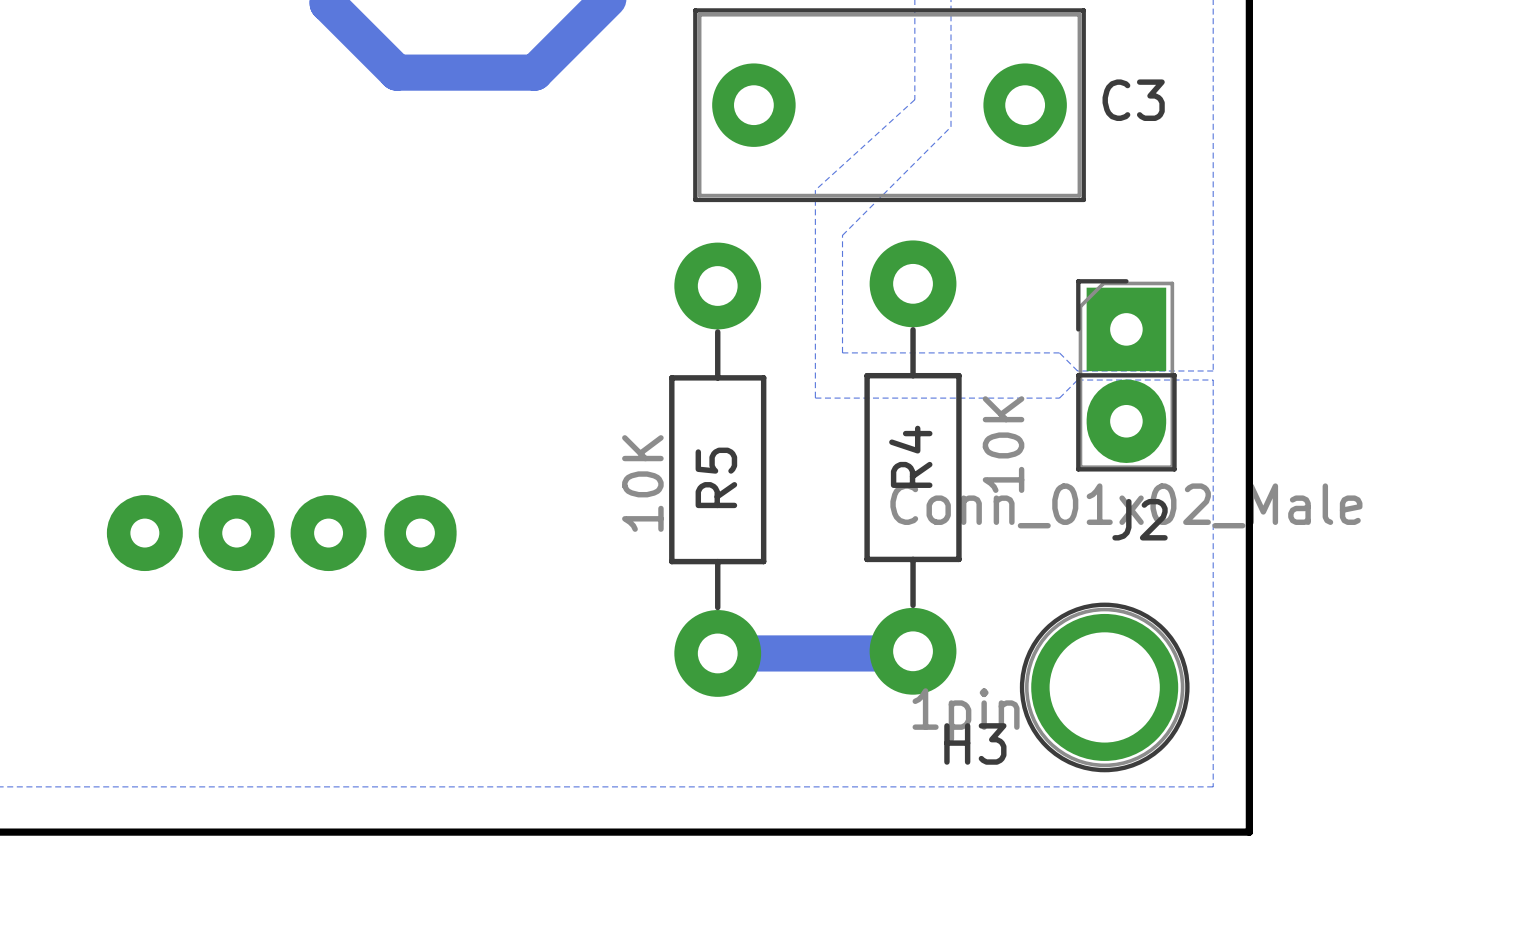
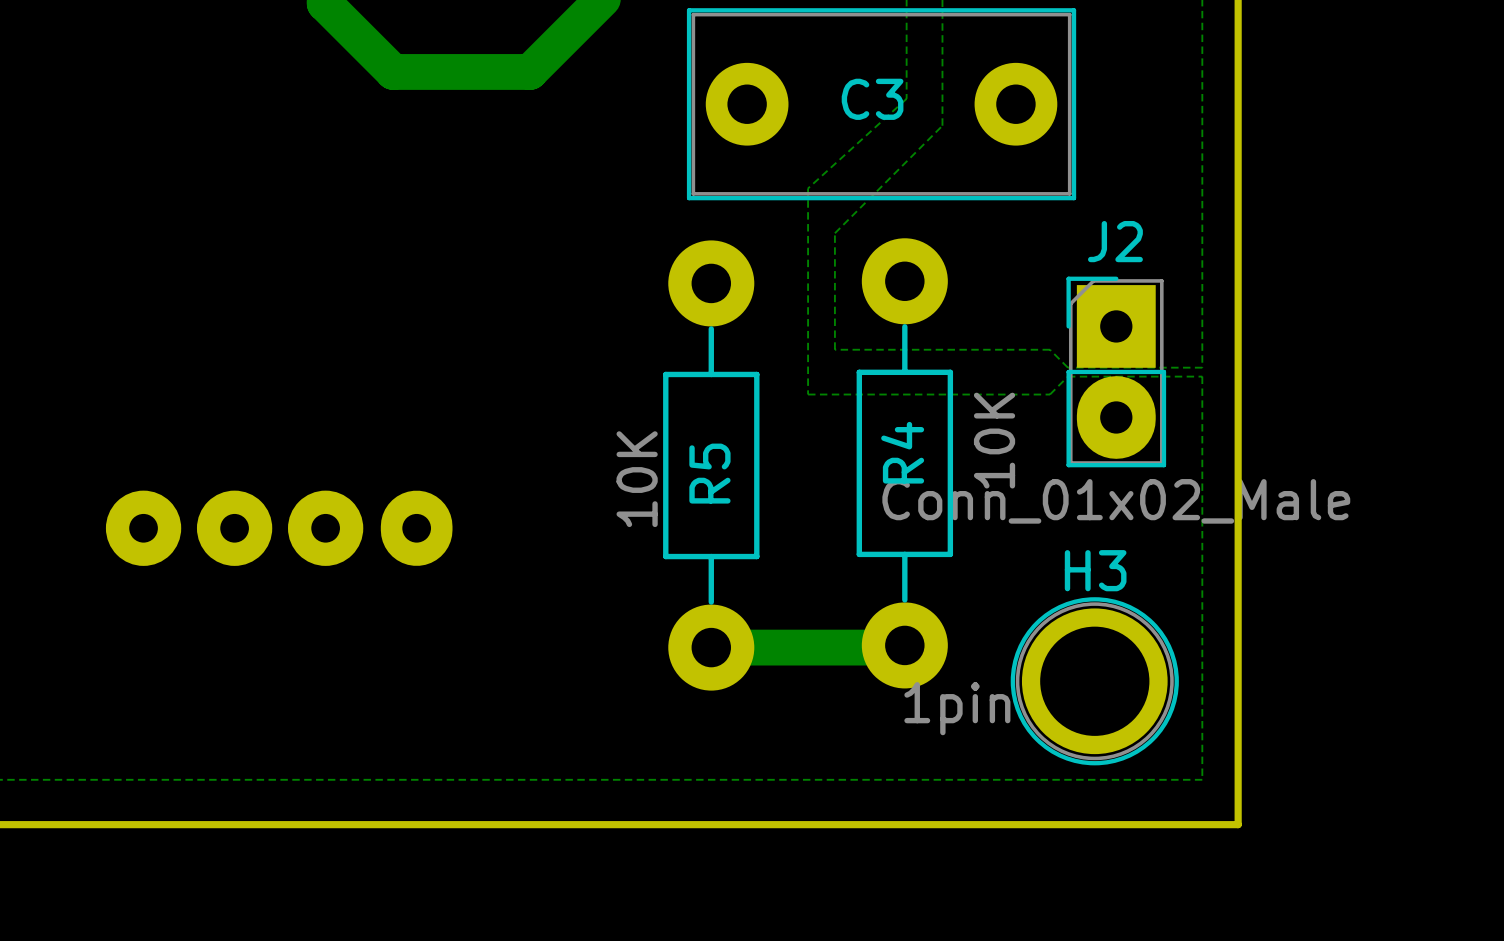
C3 name position: C3 (1133, 100) -> C3 (872, 99)
J2 name position: J2 (1140, 519) -> J2 (1115, 241)
H3 name position: H3 (975, 743) -> H3 (1095, 570)

